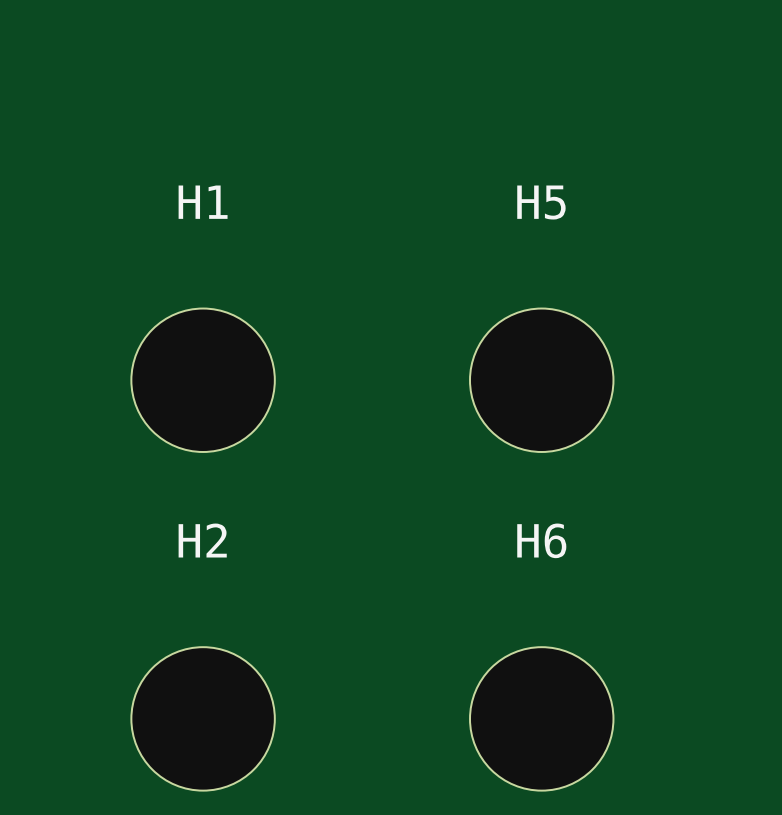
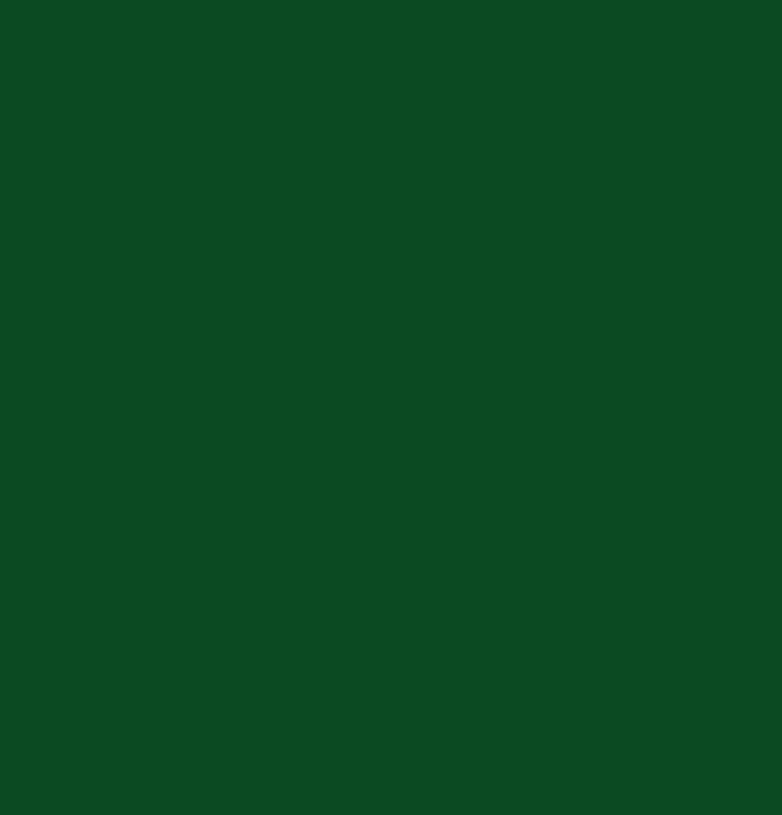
H1: (203, 380) -> none
H5: (541, 380) -> none
H2: (203, 718) -> none
H6: (541, 718) -> none

